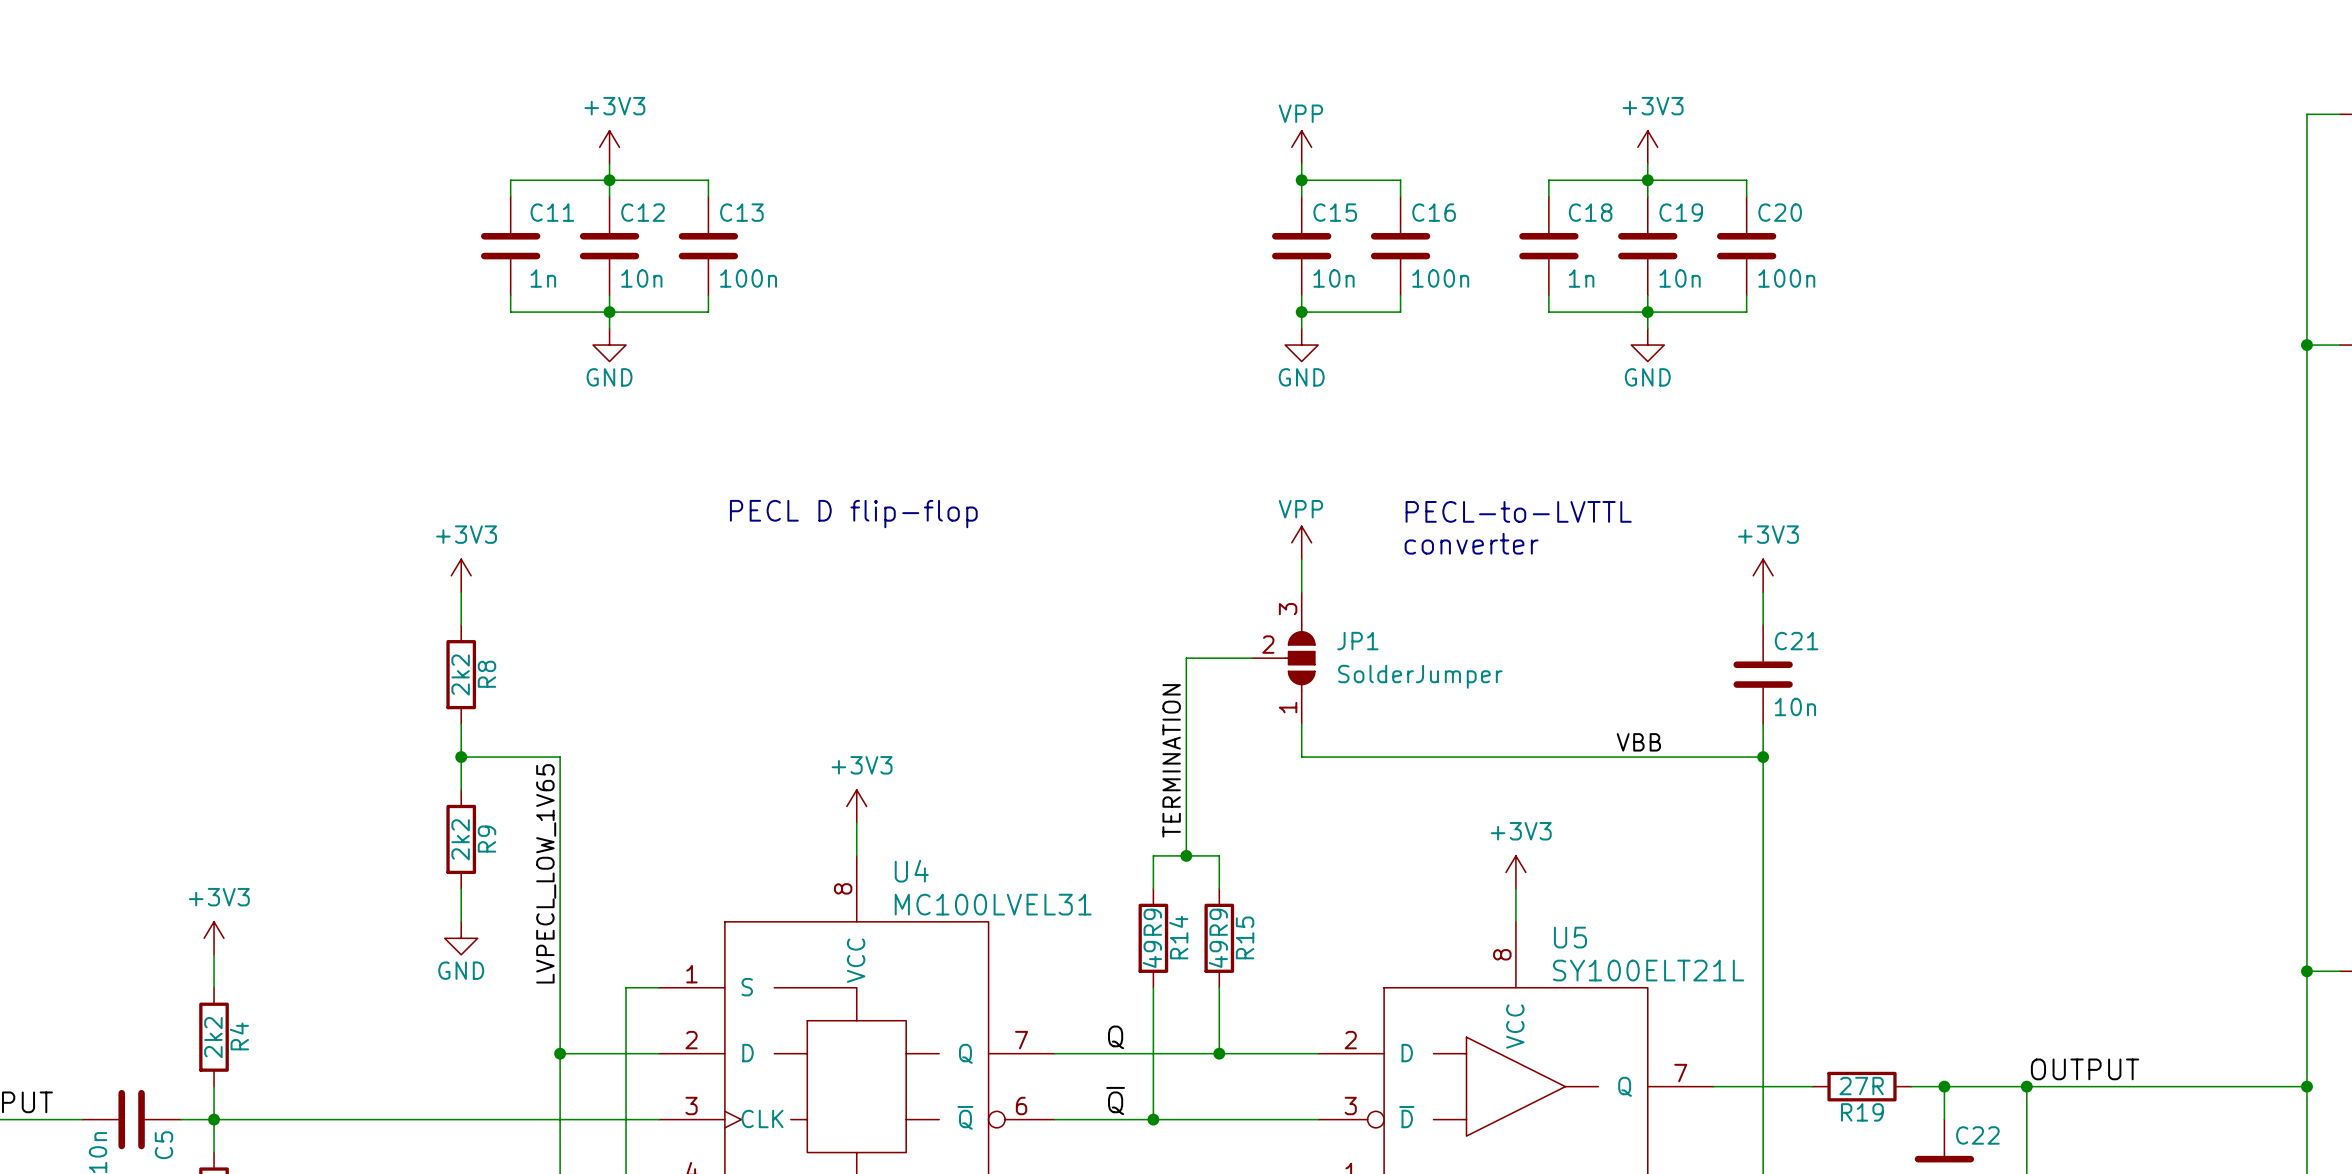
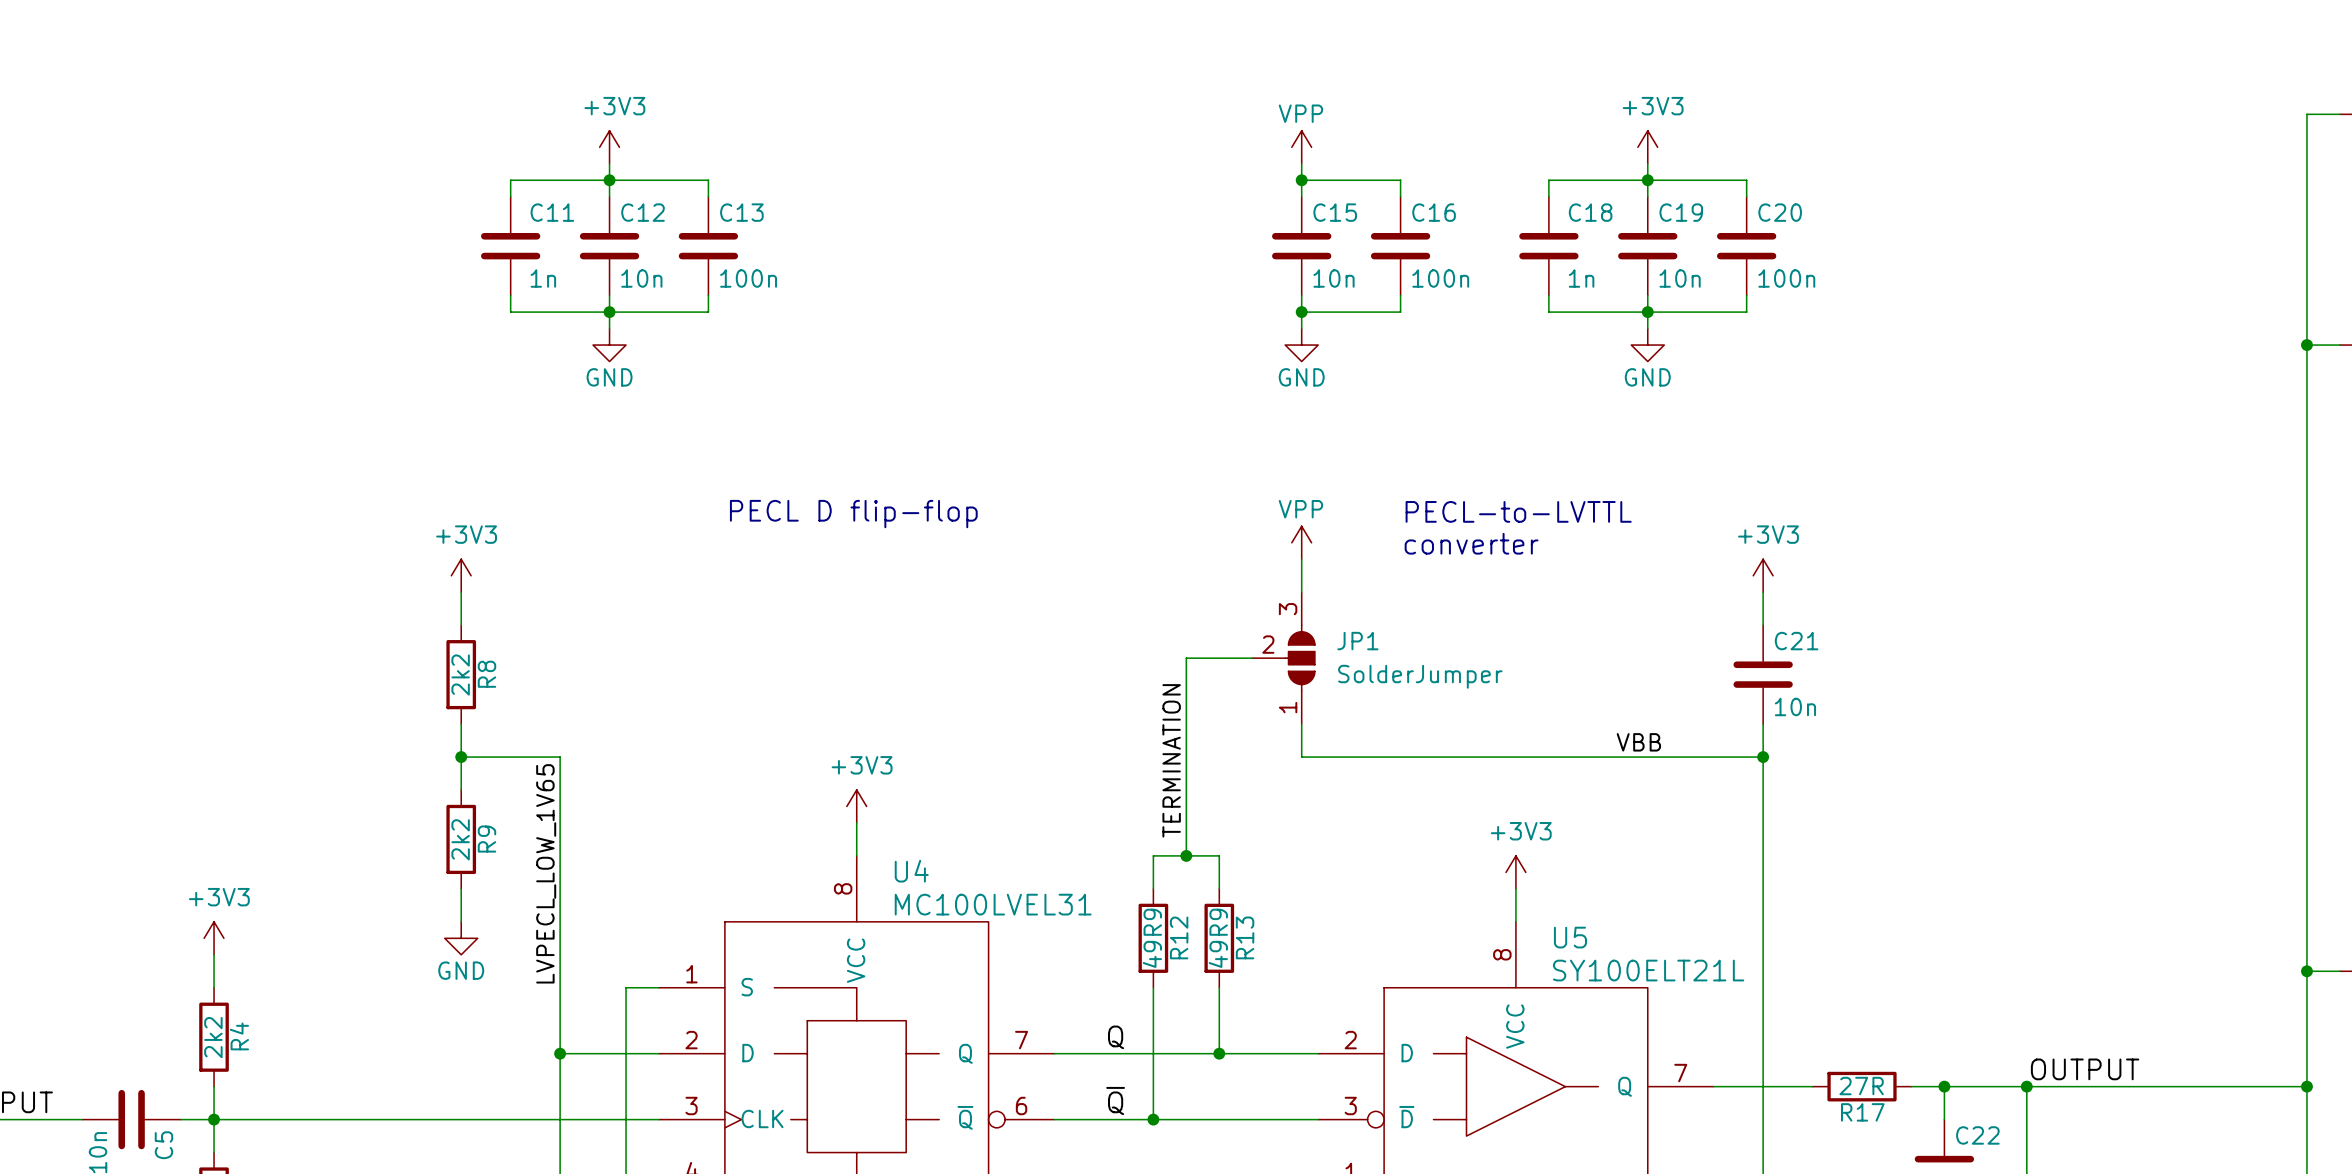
R14 name: R14 (1178, 937) -> R12 (1179, 937)
R15 name: R15 (1245, 937) -> R13 (1245, 937)
R19 name: R19 (1862, 1112) -> R17 (1862, 1112)

